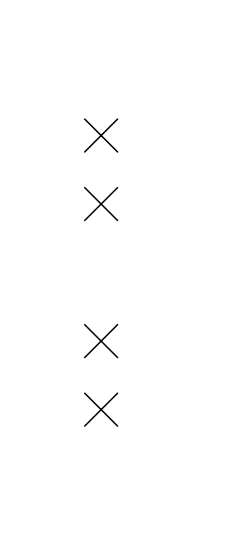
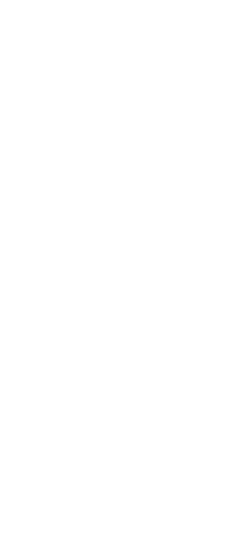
no-connect mark: (101, 135) -> none
no-connect mark: (101, 204) -> none
no-connect mark: (101, 341) -> none
no-connect mark: (101, 409) -> none

